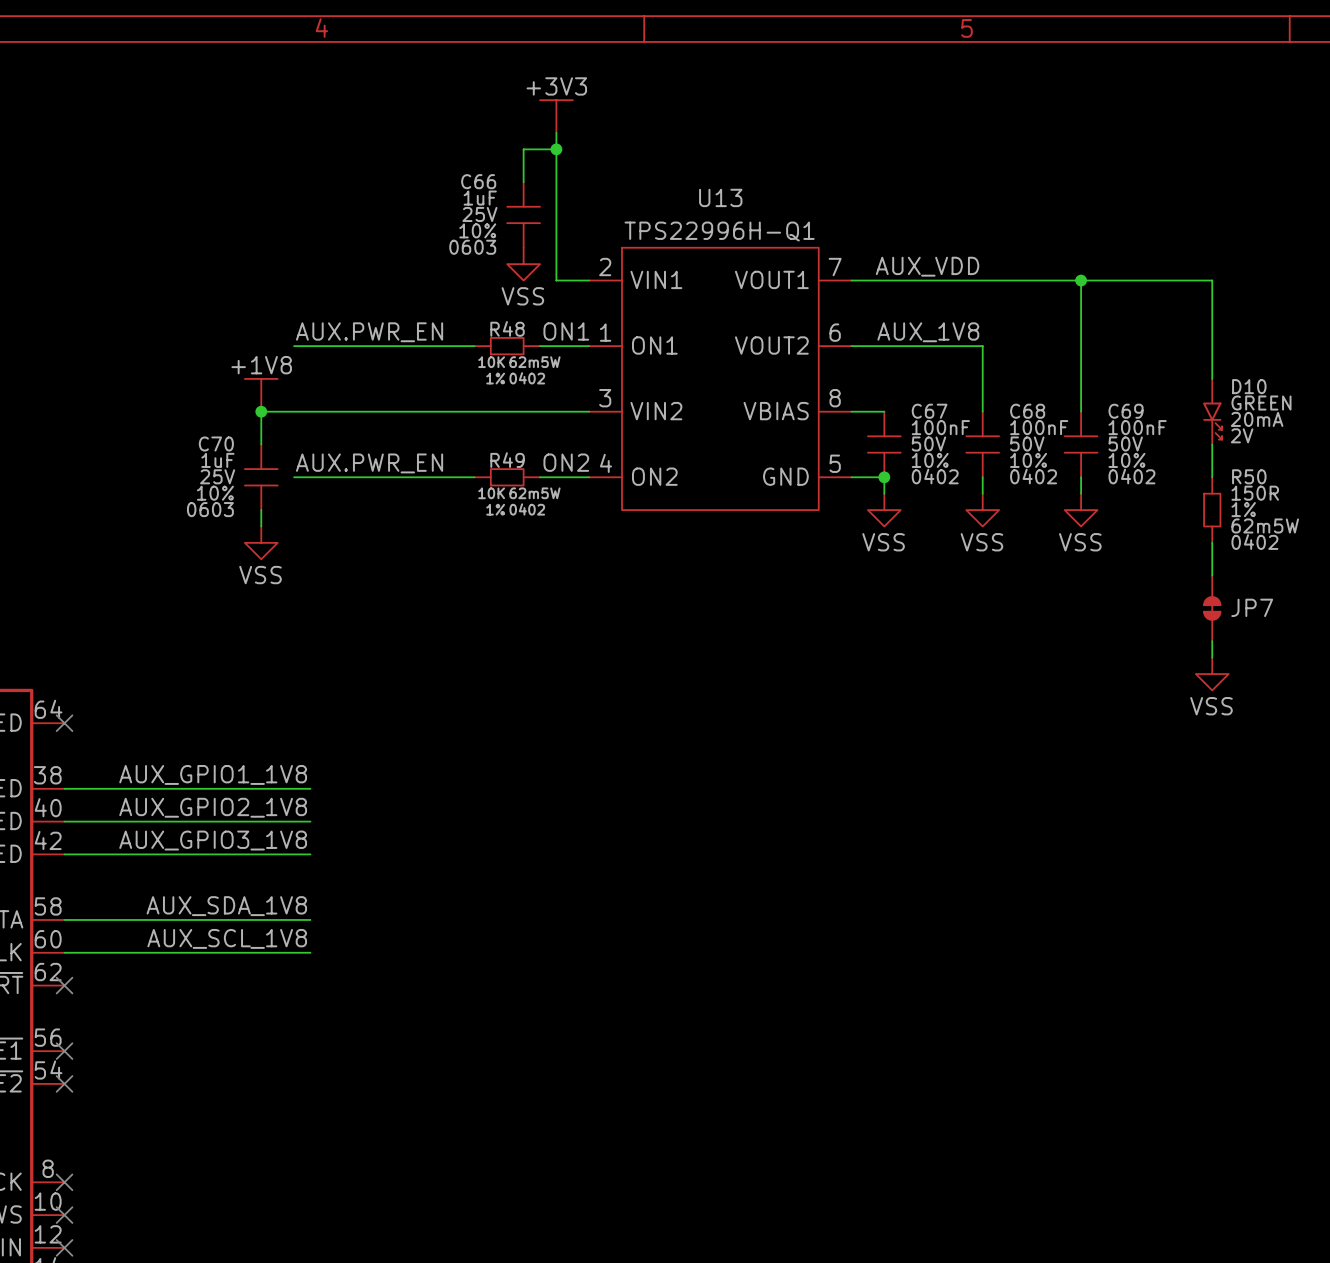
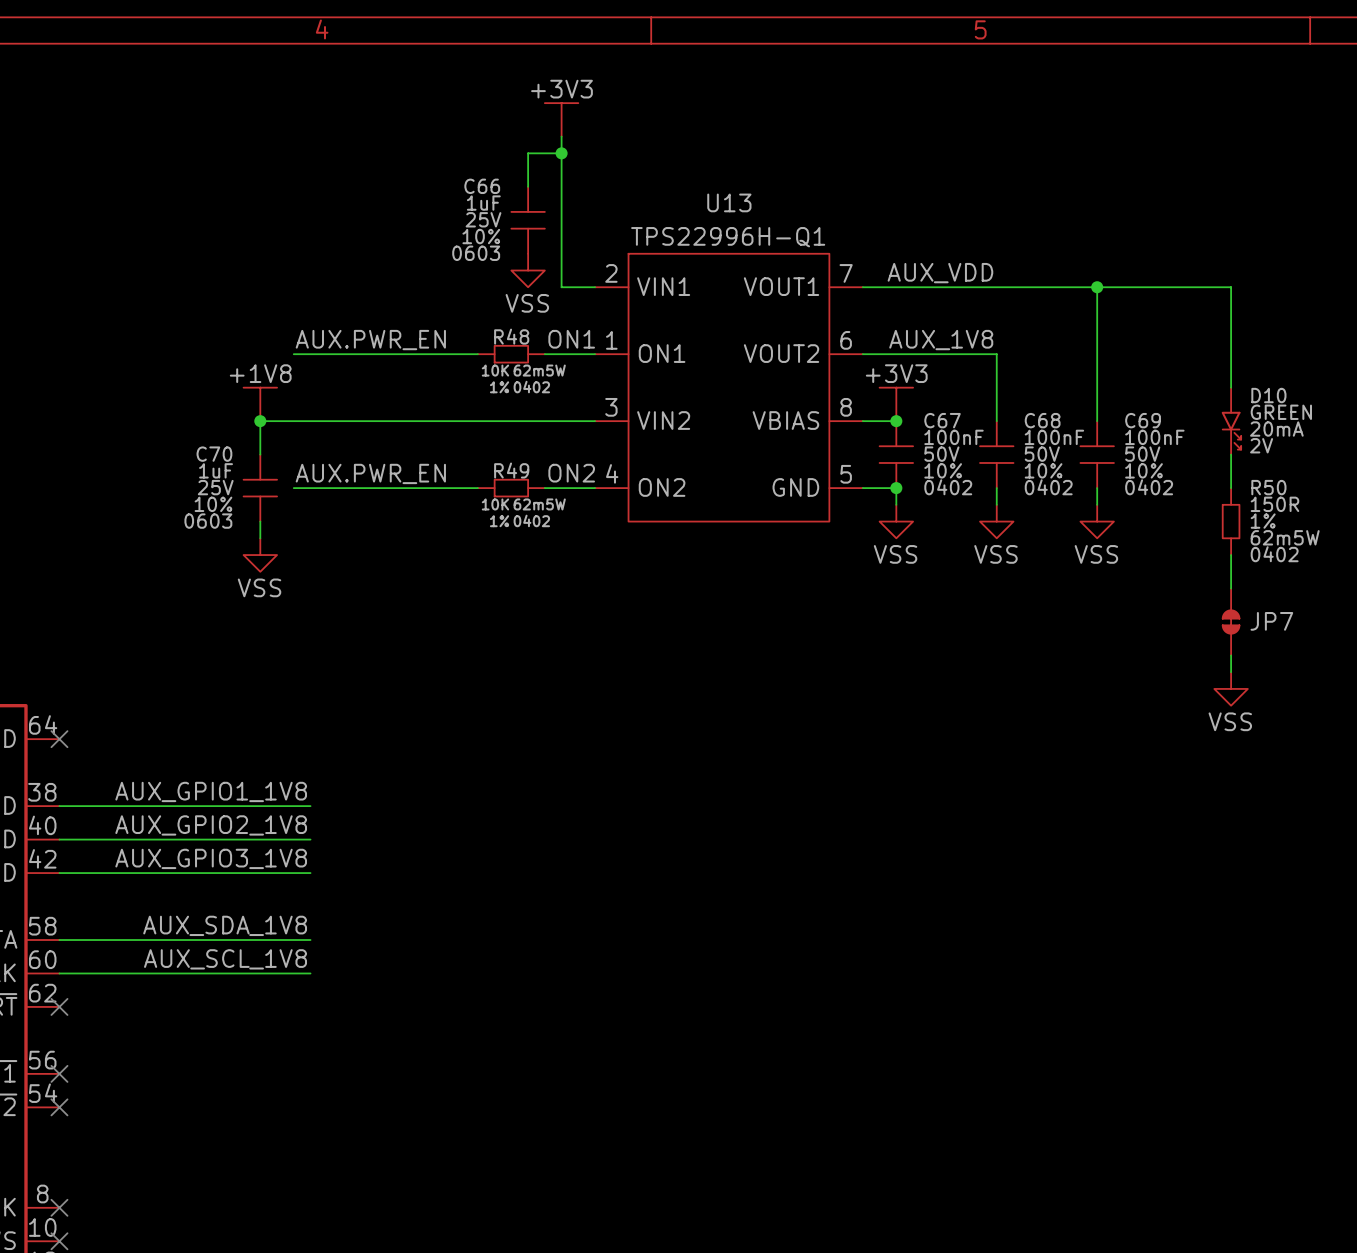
power symbol: none -> +3V3 (896, 404)
junction: none -> (896, 421)

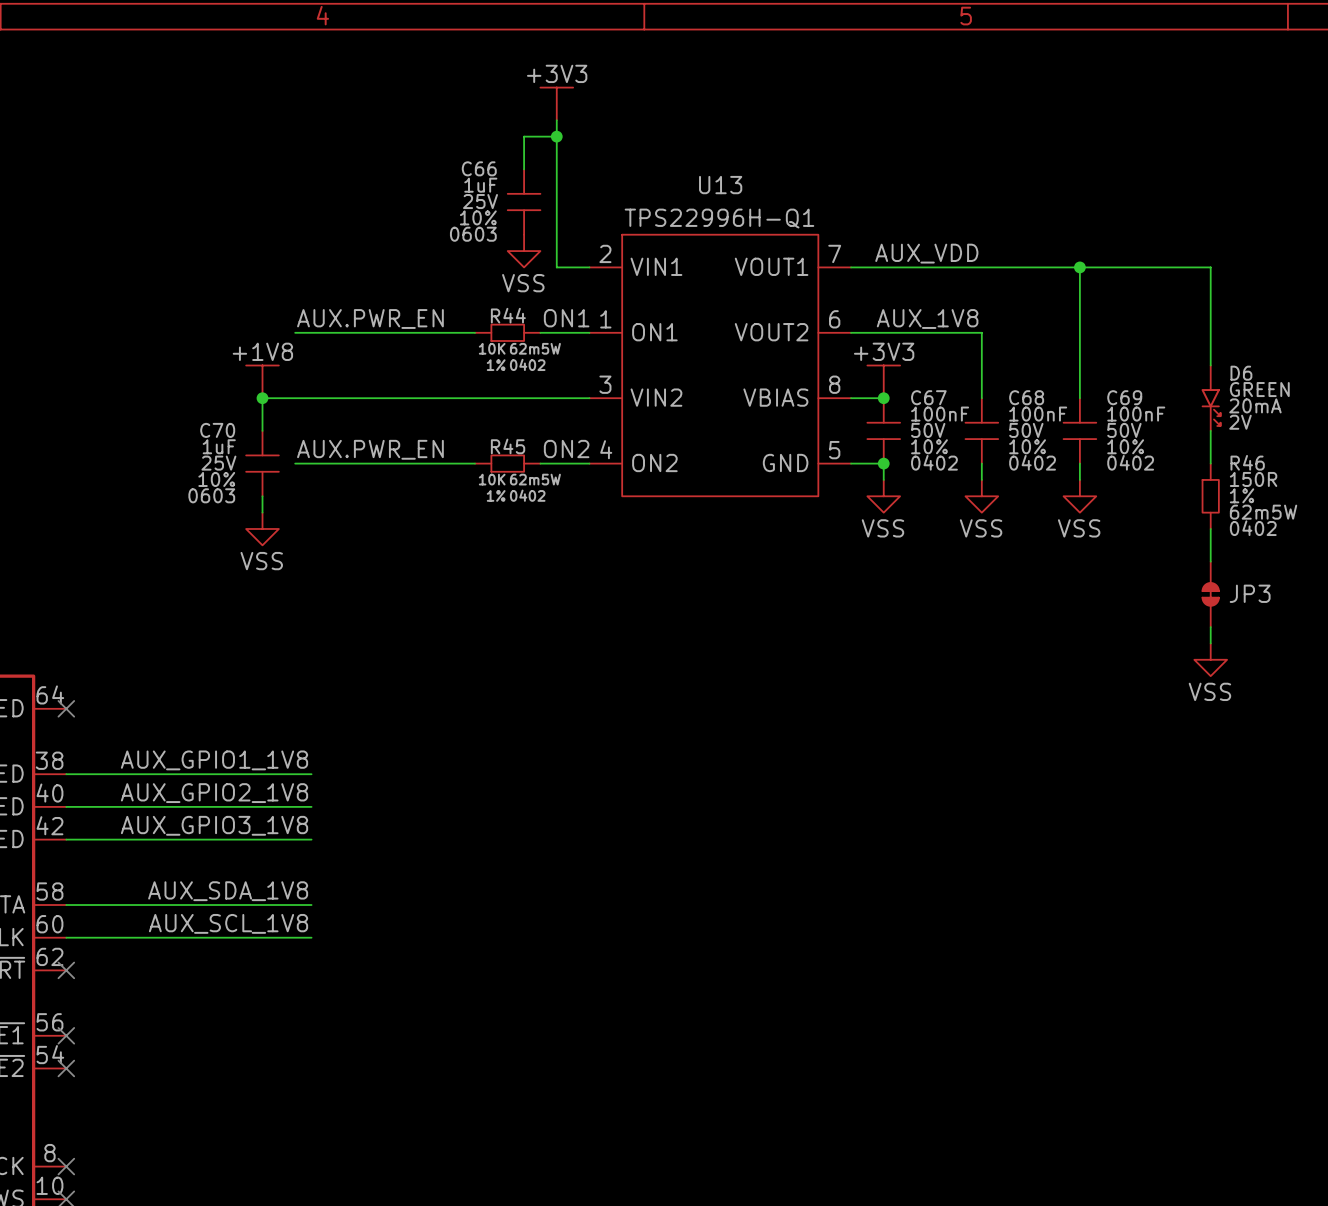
R48 name: R48 (511, 336) -> R44 (508, 315)
D10 name: D10 (1268, 395) -> D6 (1241, 373)
R49 name: R49 (511, 470) -> R45 (508, 446)
R50 name: R50 (1268, 487) -> R46 (1247, 462)
JP7 name: JP7 (1271, 621) -> JP3 (1250, 593)

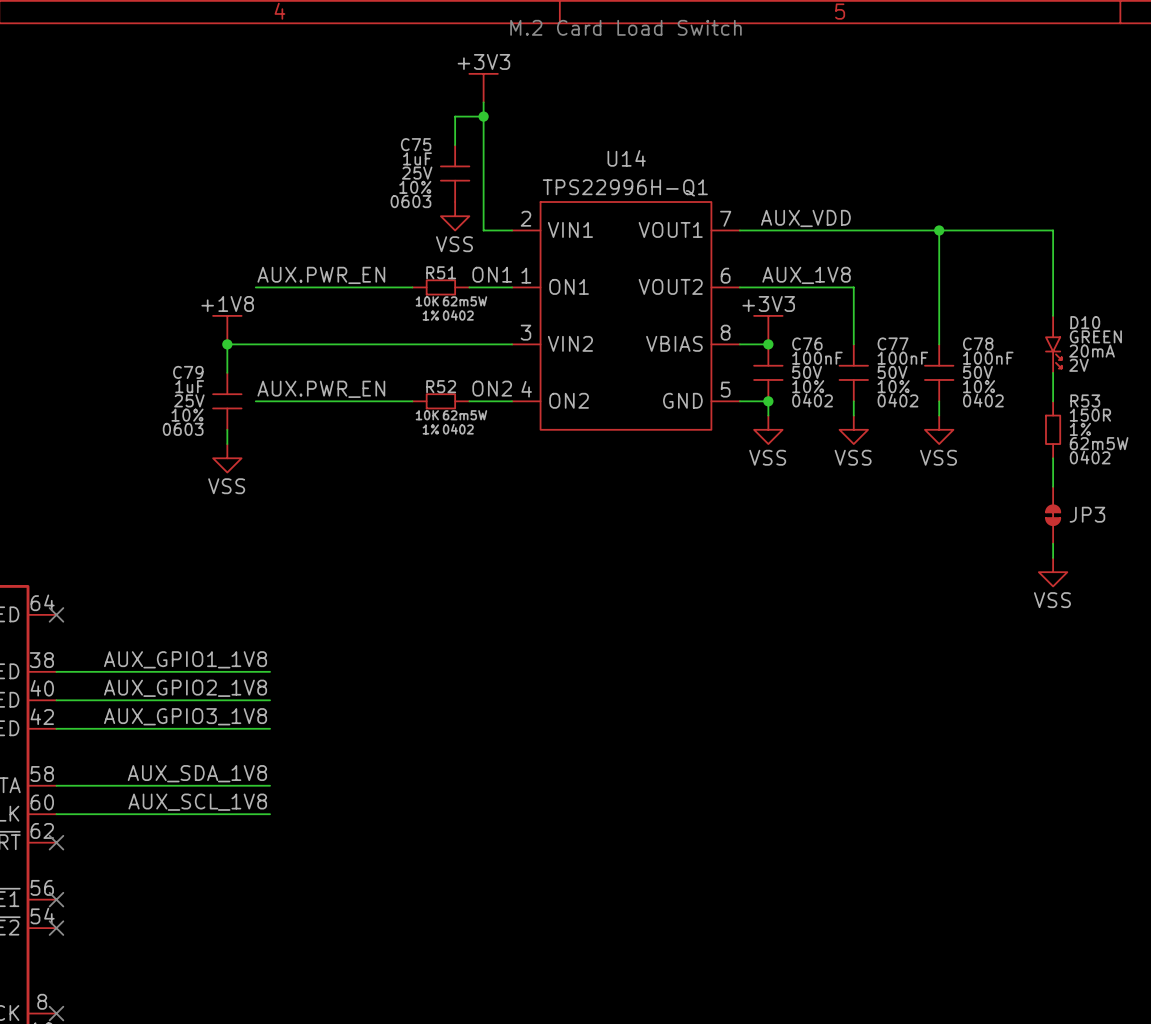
text: none -> M.2 Card Load Switch (625, 27)
C66 name: C66 (479, 168) -> C75 (416, 144)
U13 name: U13 (720, 185) -> U14 (626, 158)
R44 name: R44 (508, 315) -> R51 (441, 272)
D6 name: D6 (1241, 373) -> D10 (1085, 322)
C67 name: C67 (928, 397) -> C76 (807, 343)
C68 name: C68 (1026, 397) -> C77 (893, 343)
C69 name: C69 (1124, 397) -> C78 (978, 343)
C70 name: C70 (217, 430) -> C79 (188, 372)
R45 name: R45 (508, 446) -> R52 (441, 386)
R46 name: R46 (1247, 462) -> R53 (1085, 400)

